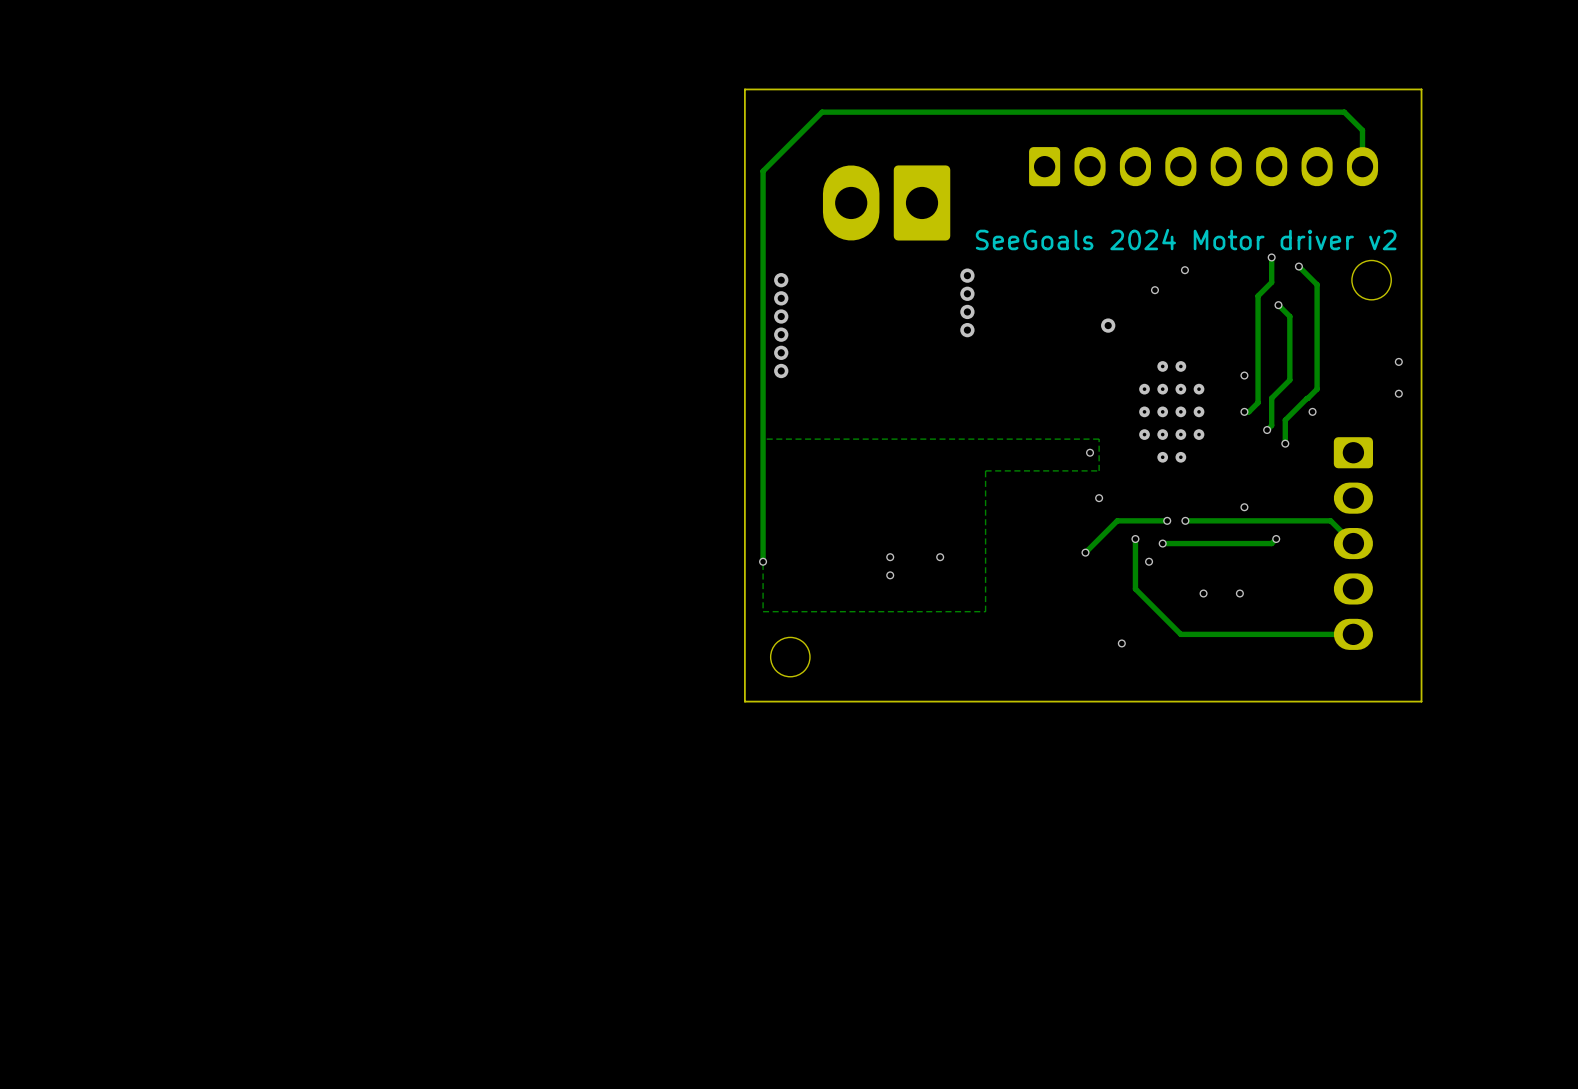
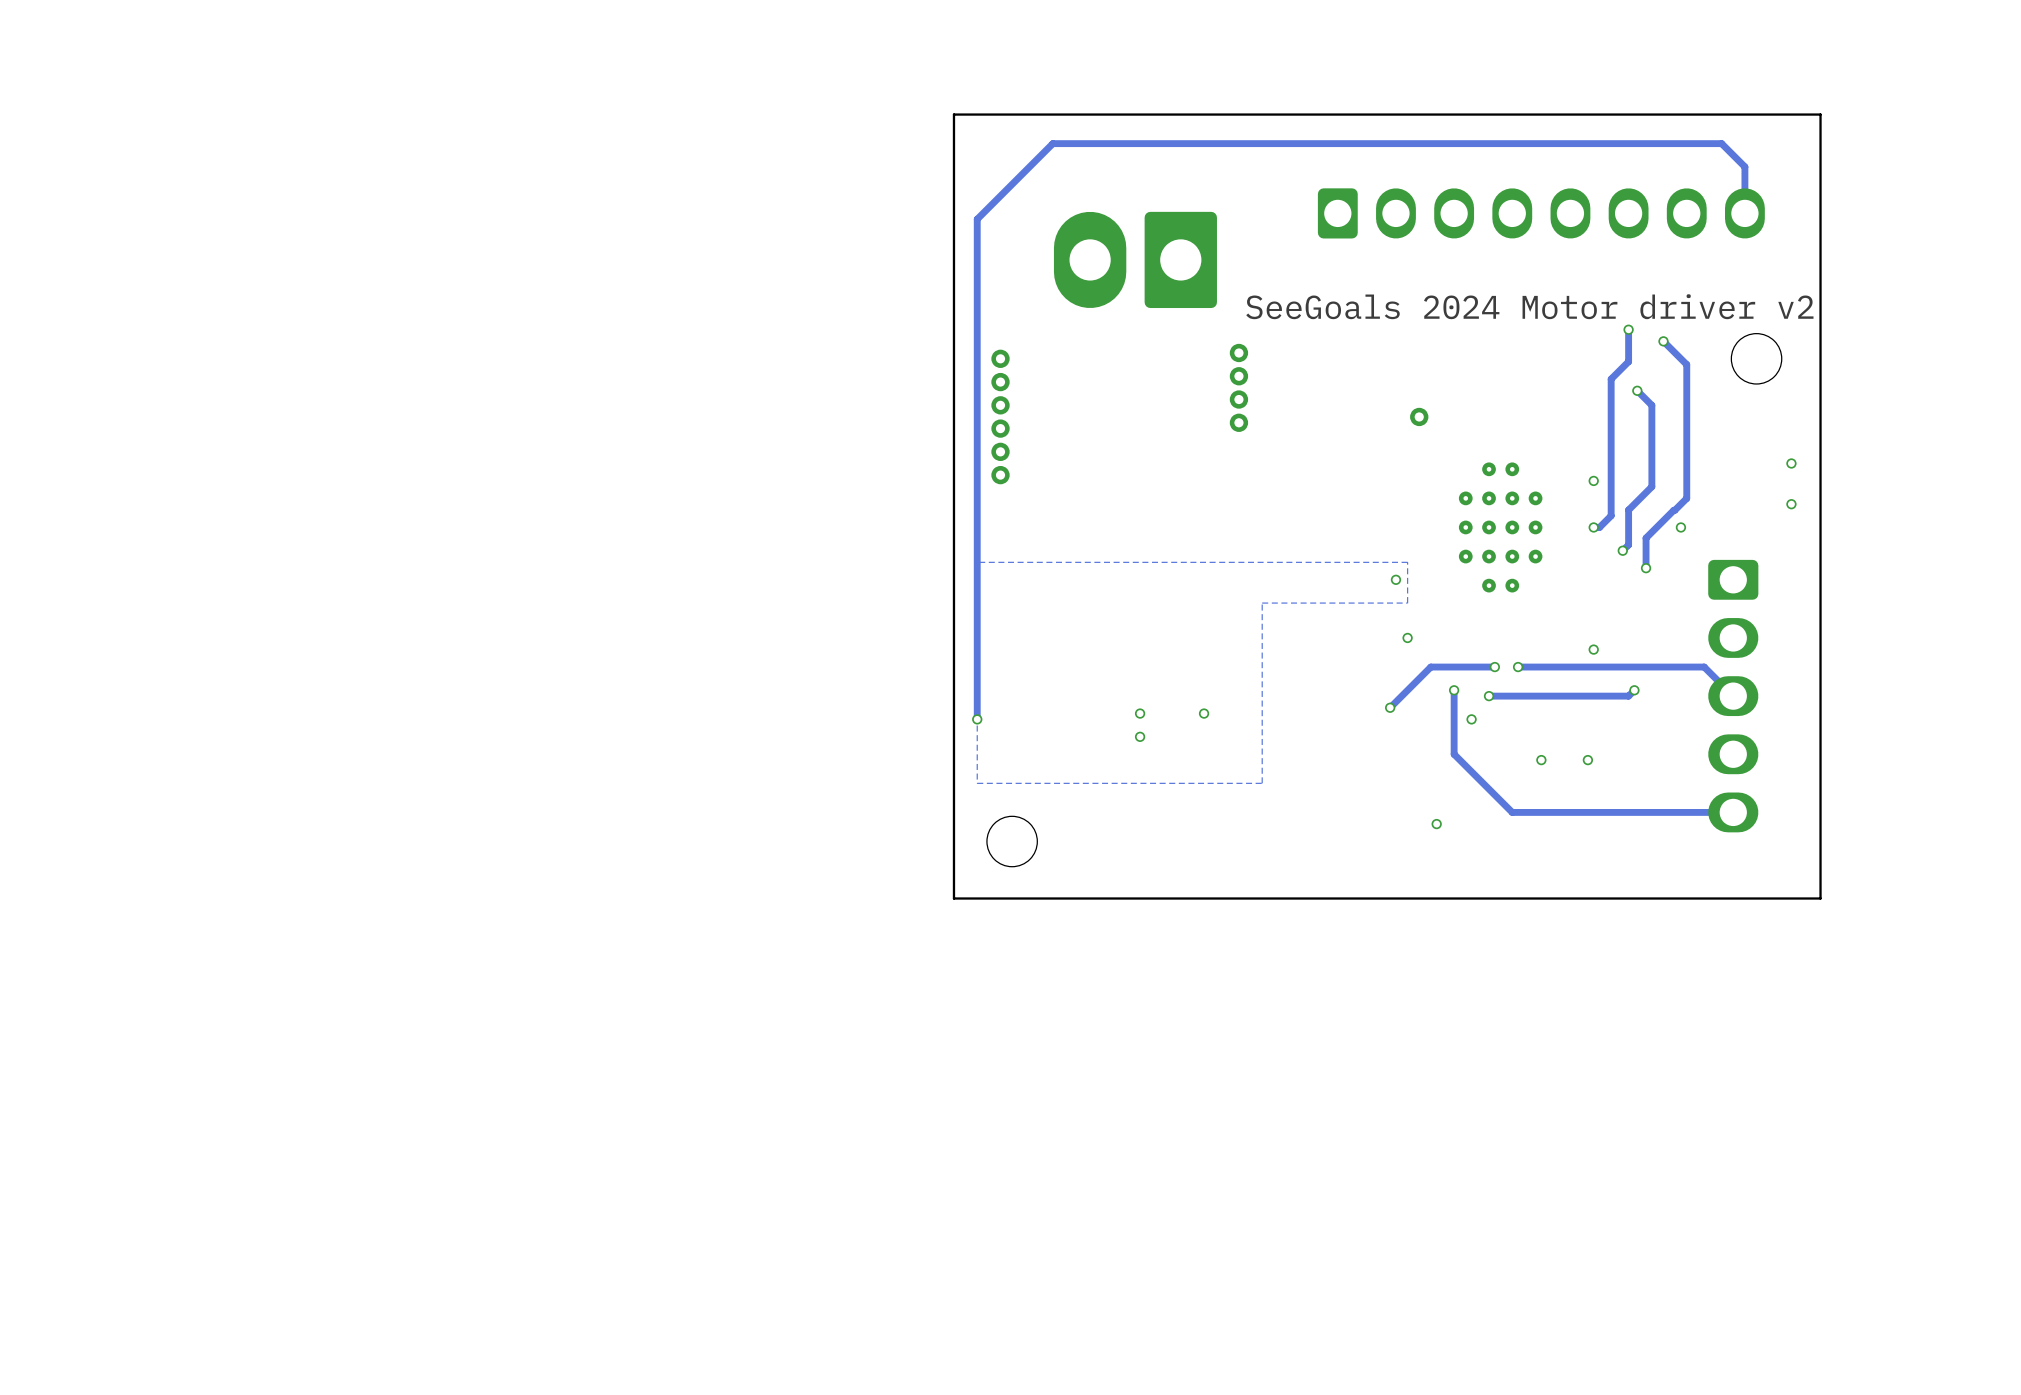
via: (1184, 270) -> none
via: (1154, 290) -> none

